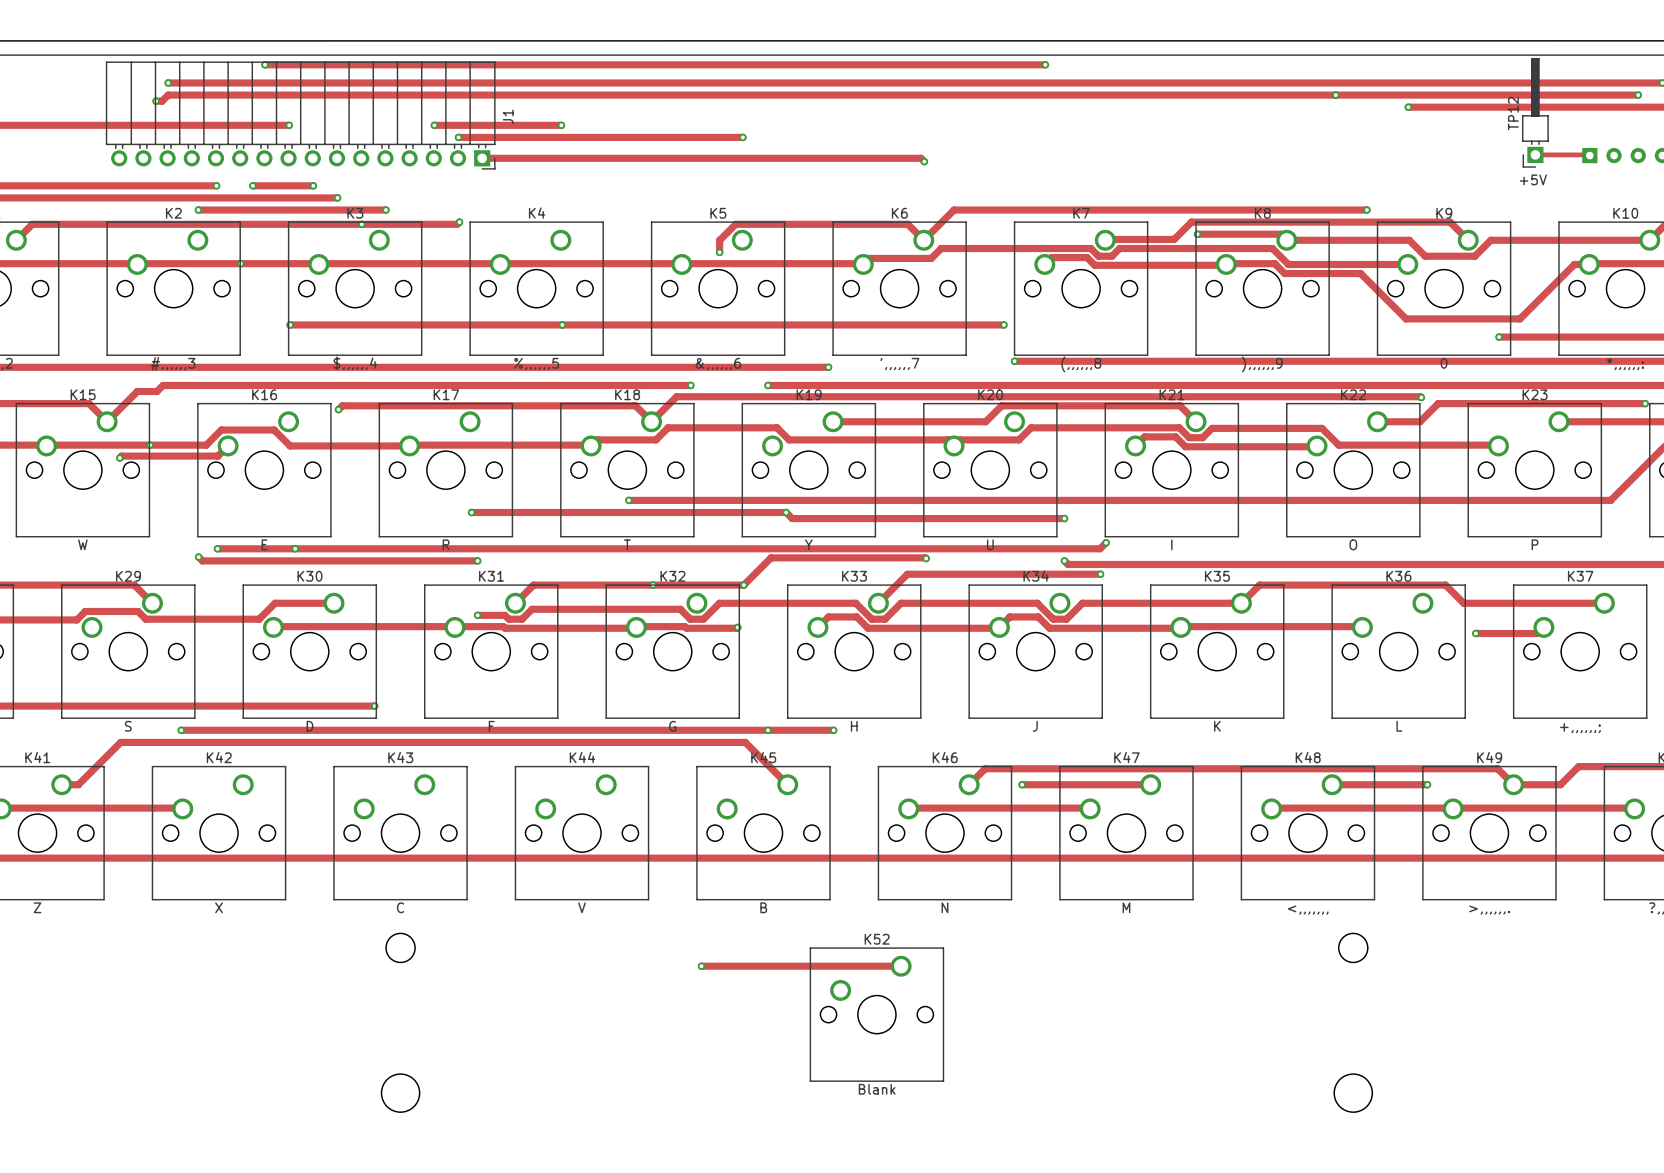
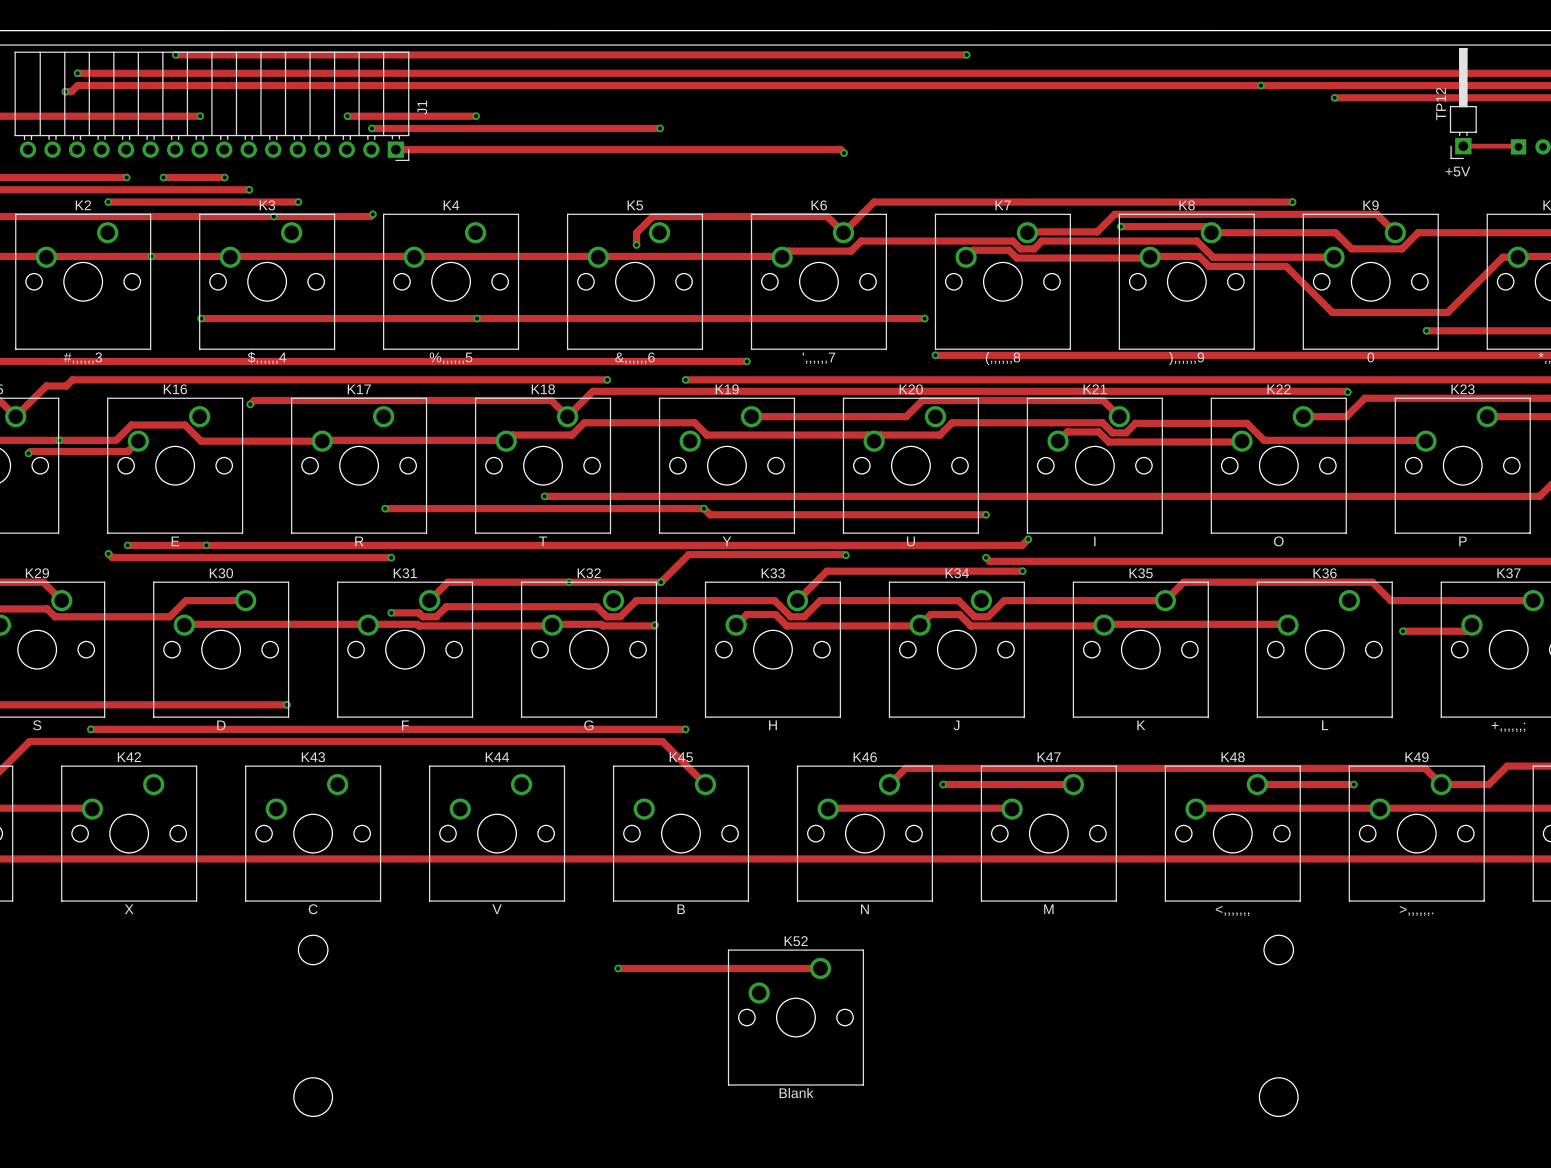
track: (768, 730) (833, 730) -> none
via: (833, 730) -> none

